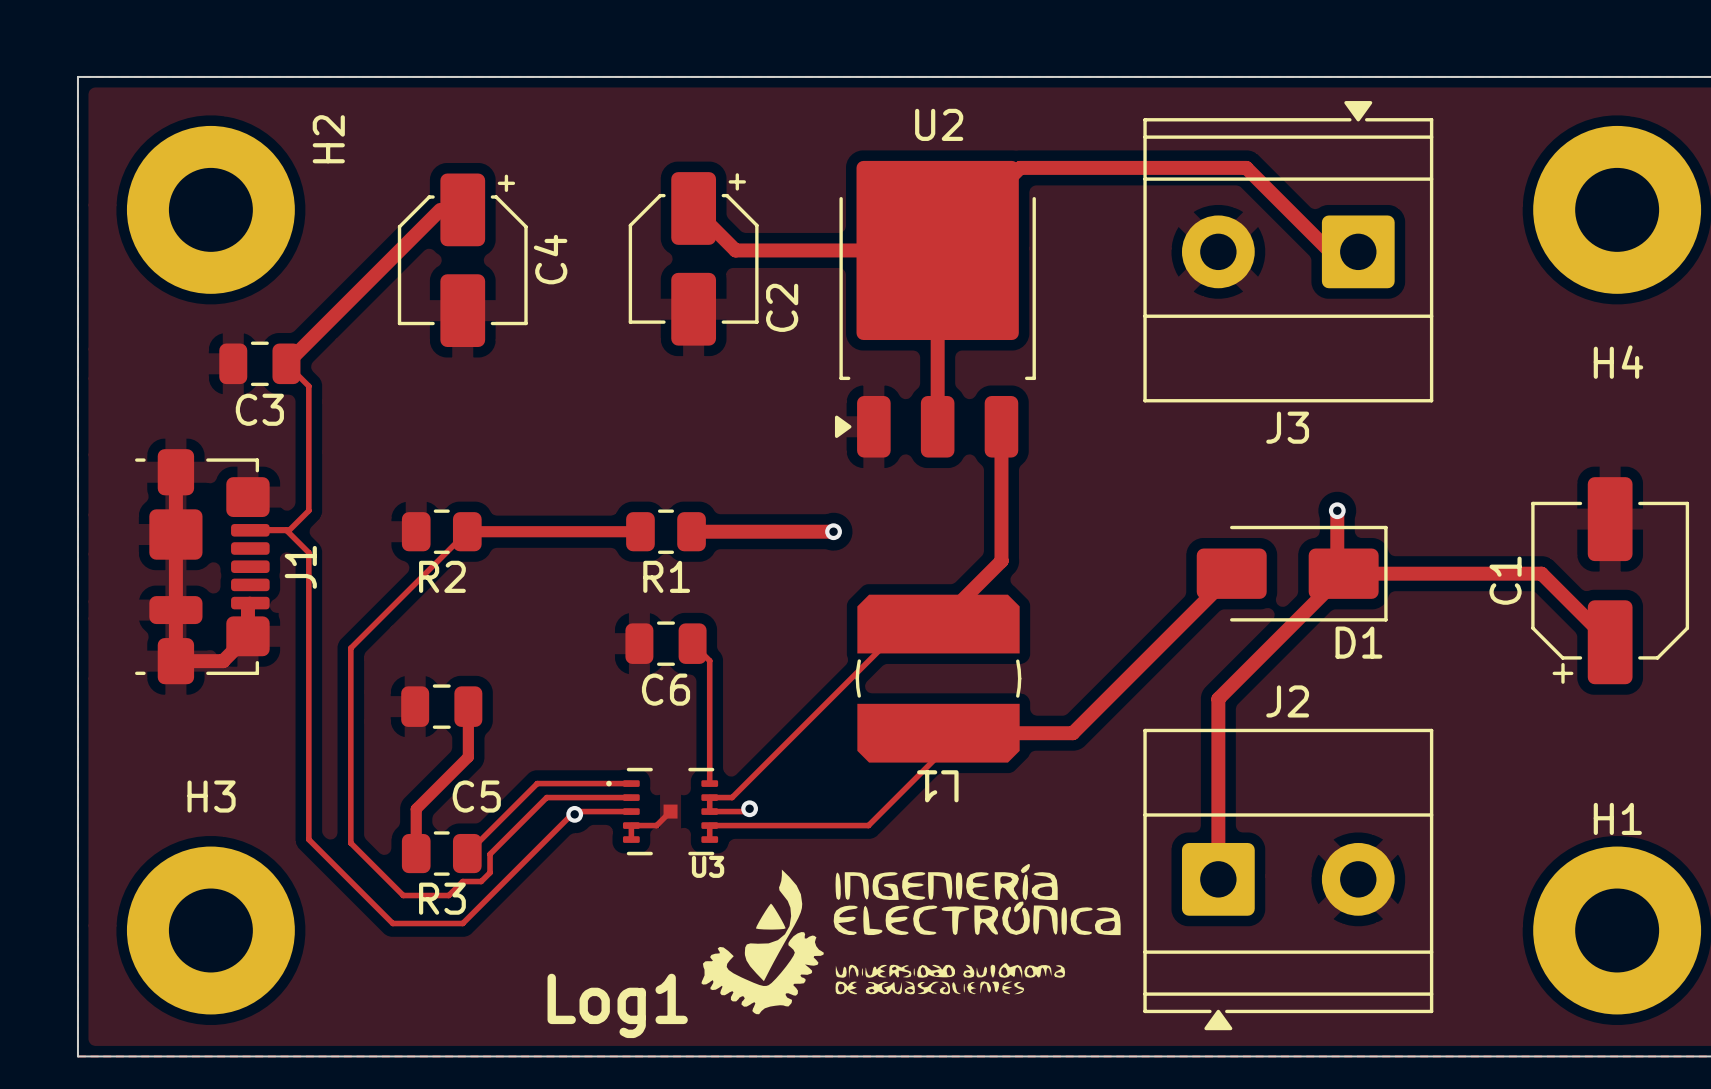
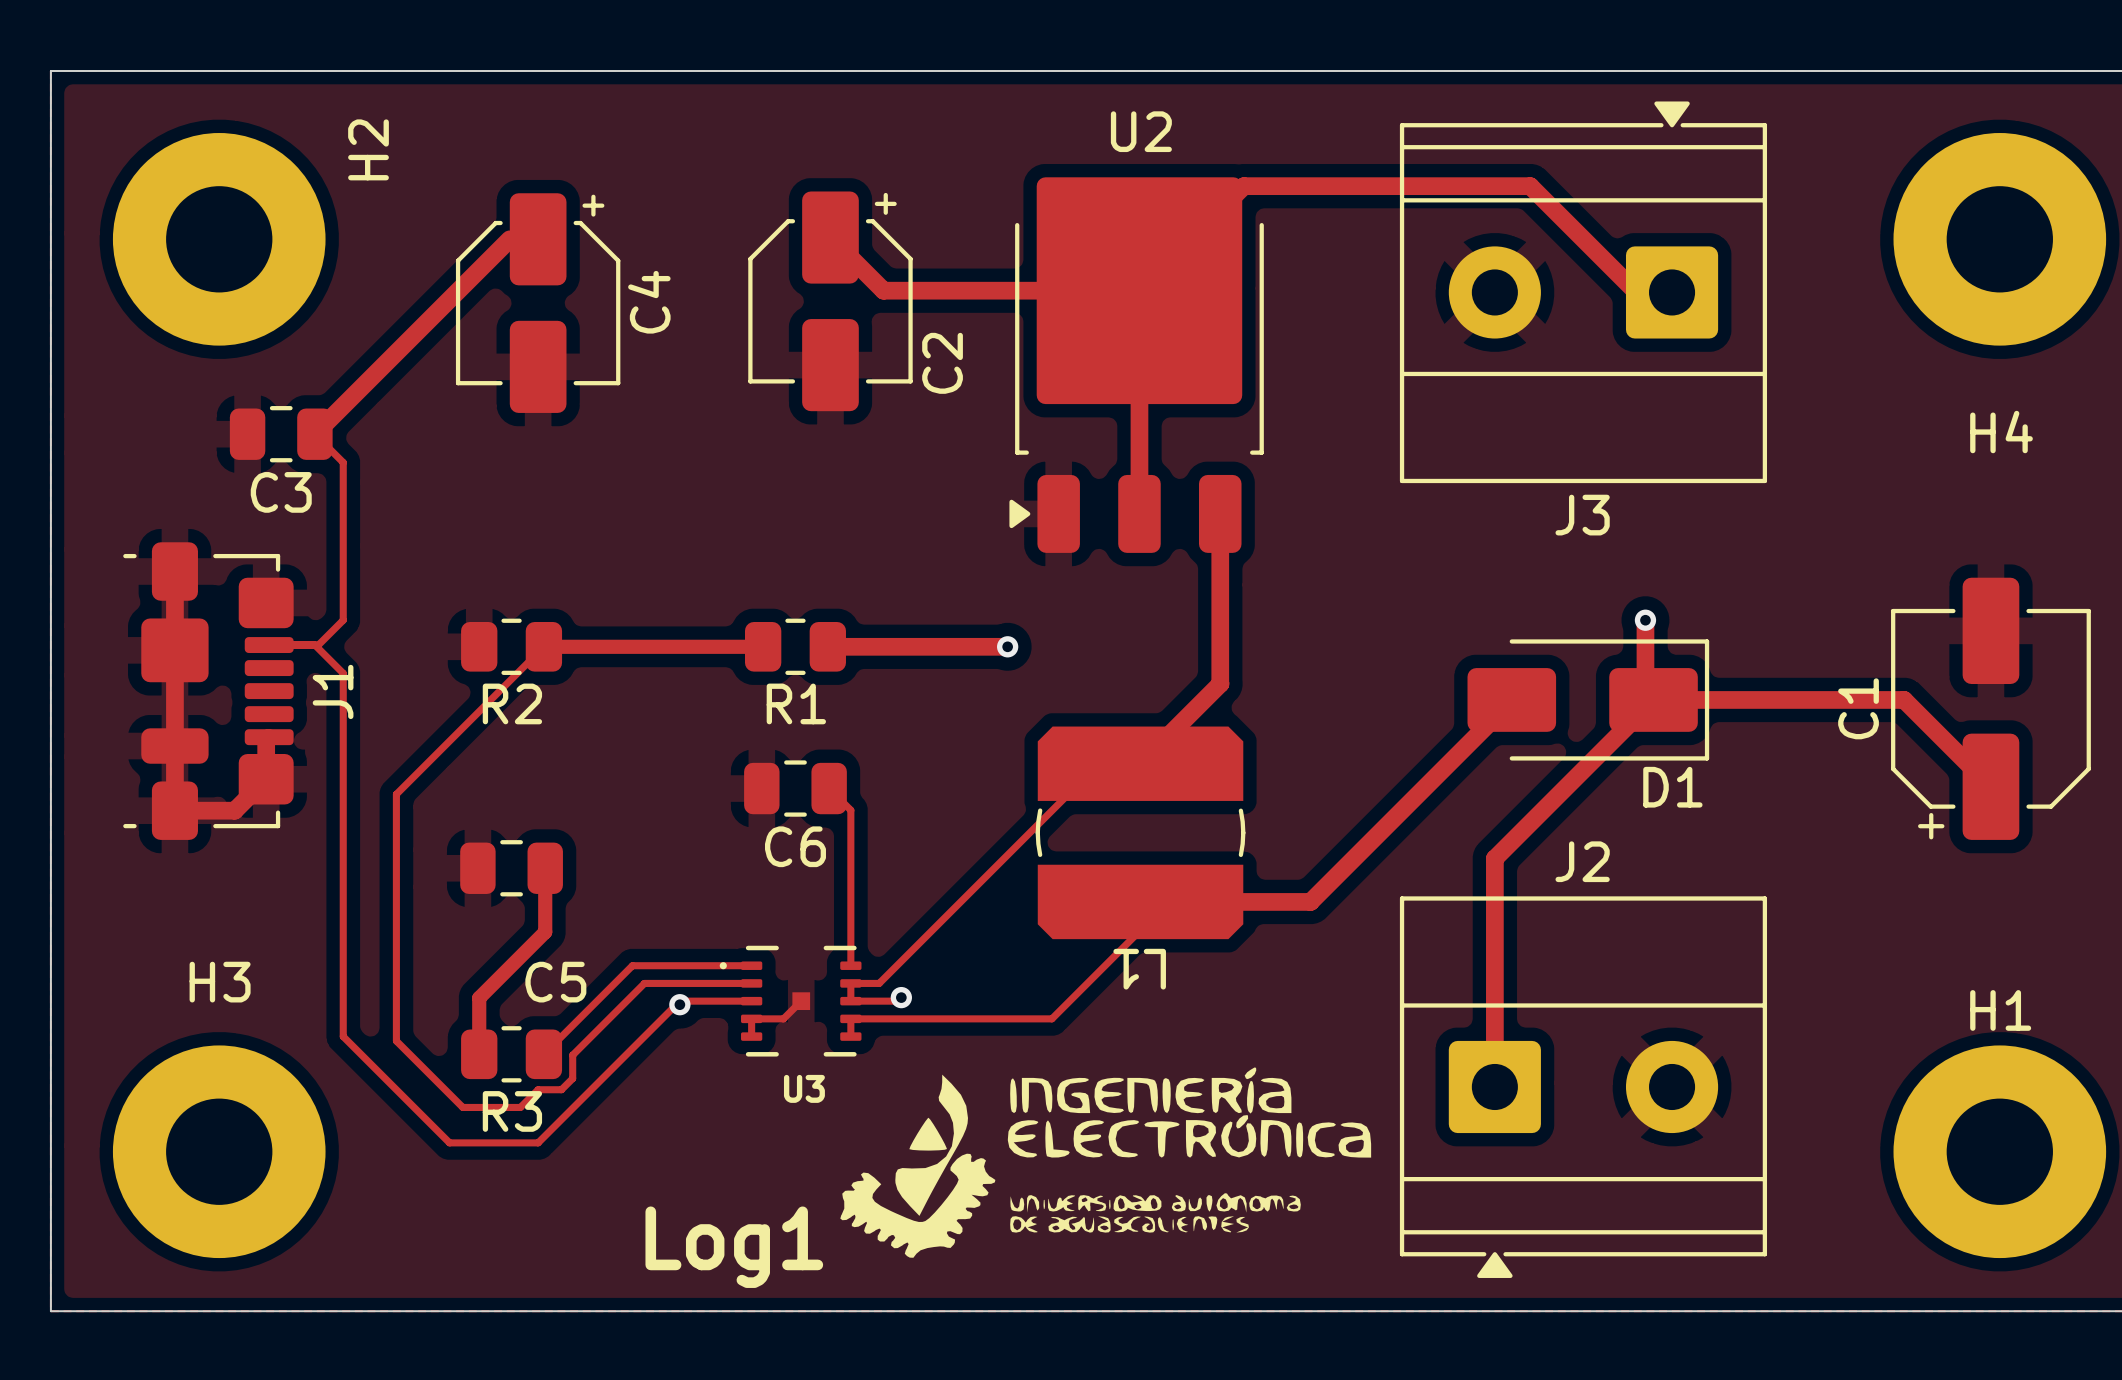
U3 name position: U3 (708, 866) -> U3 (804, 1088)

